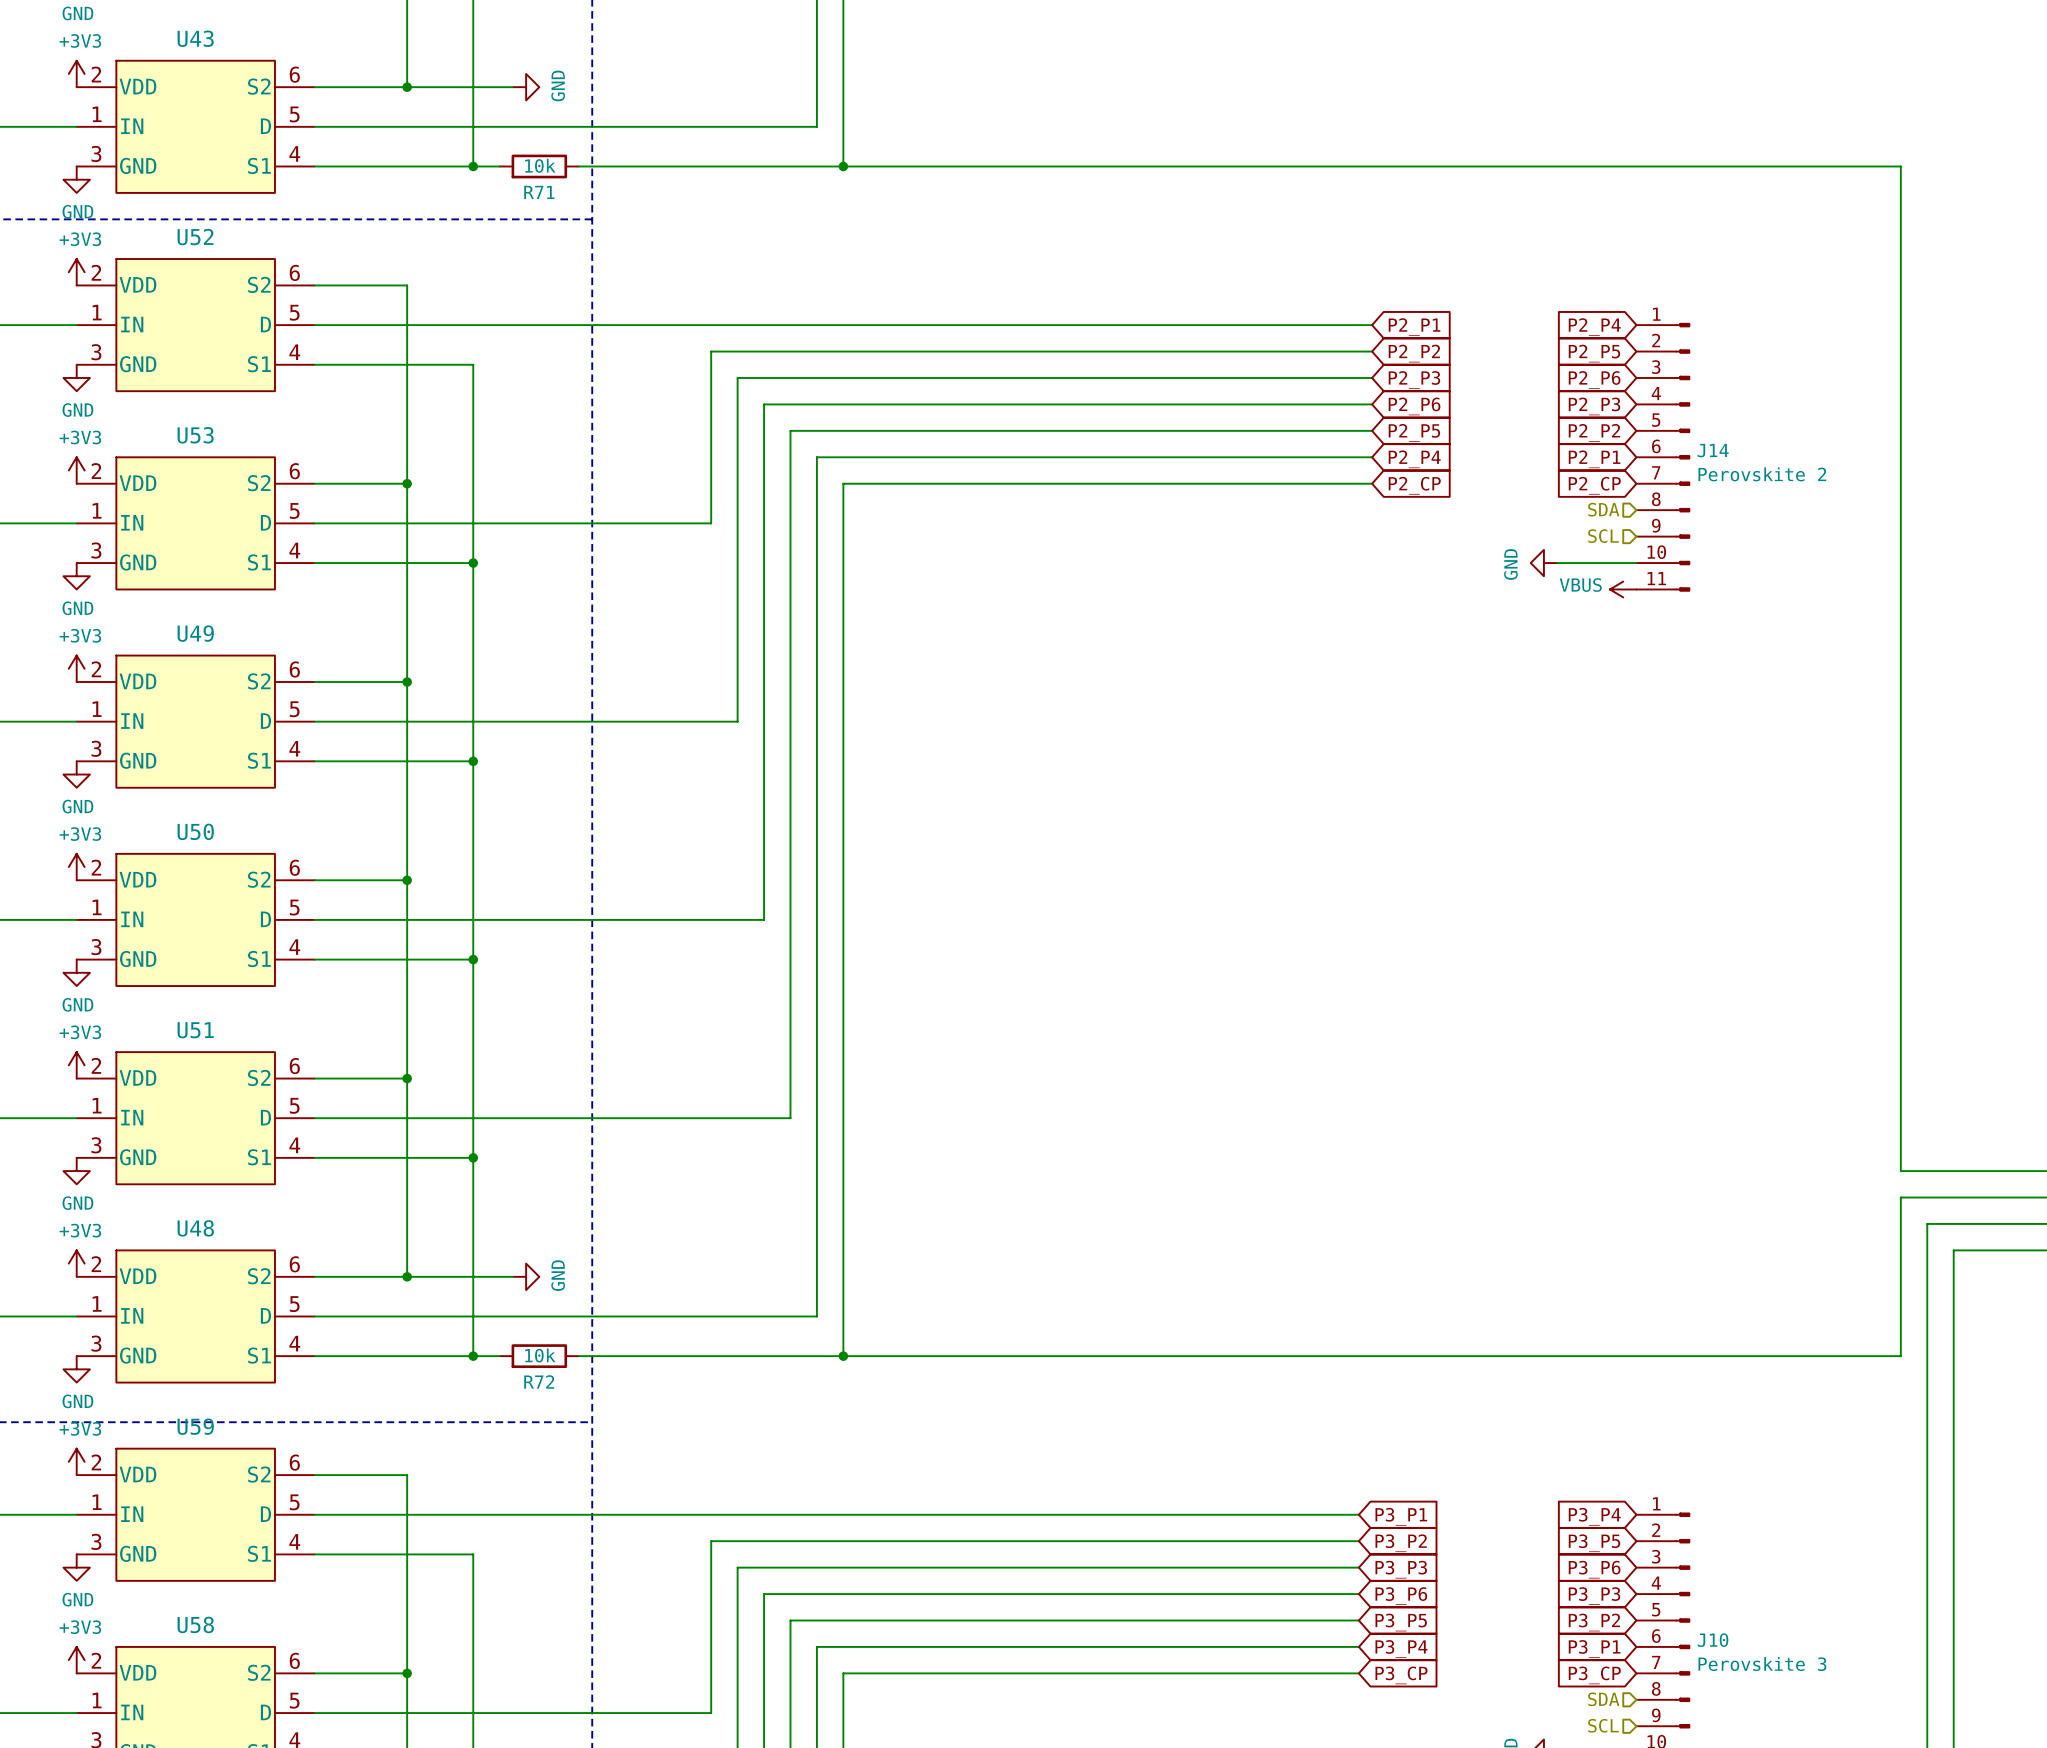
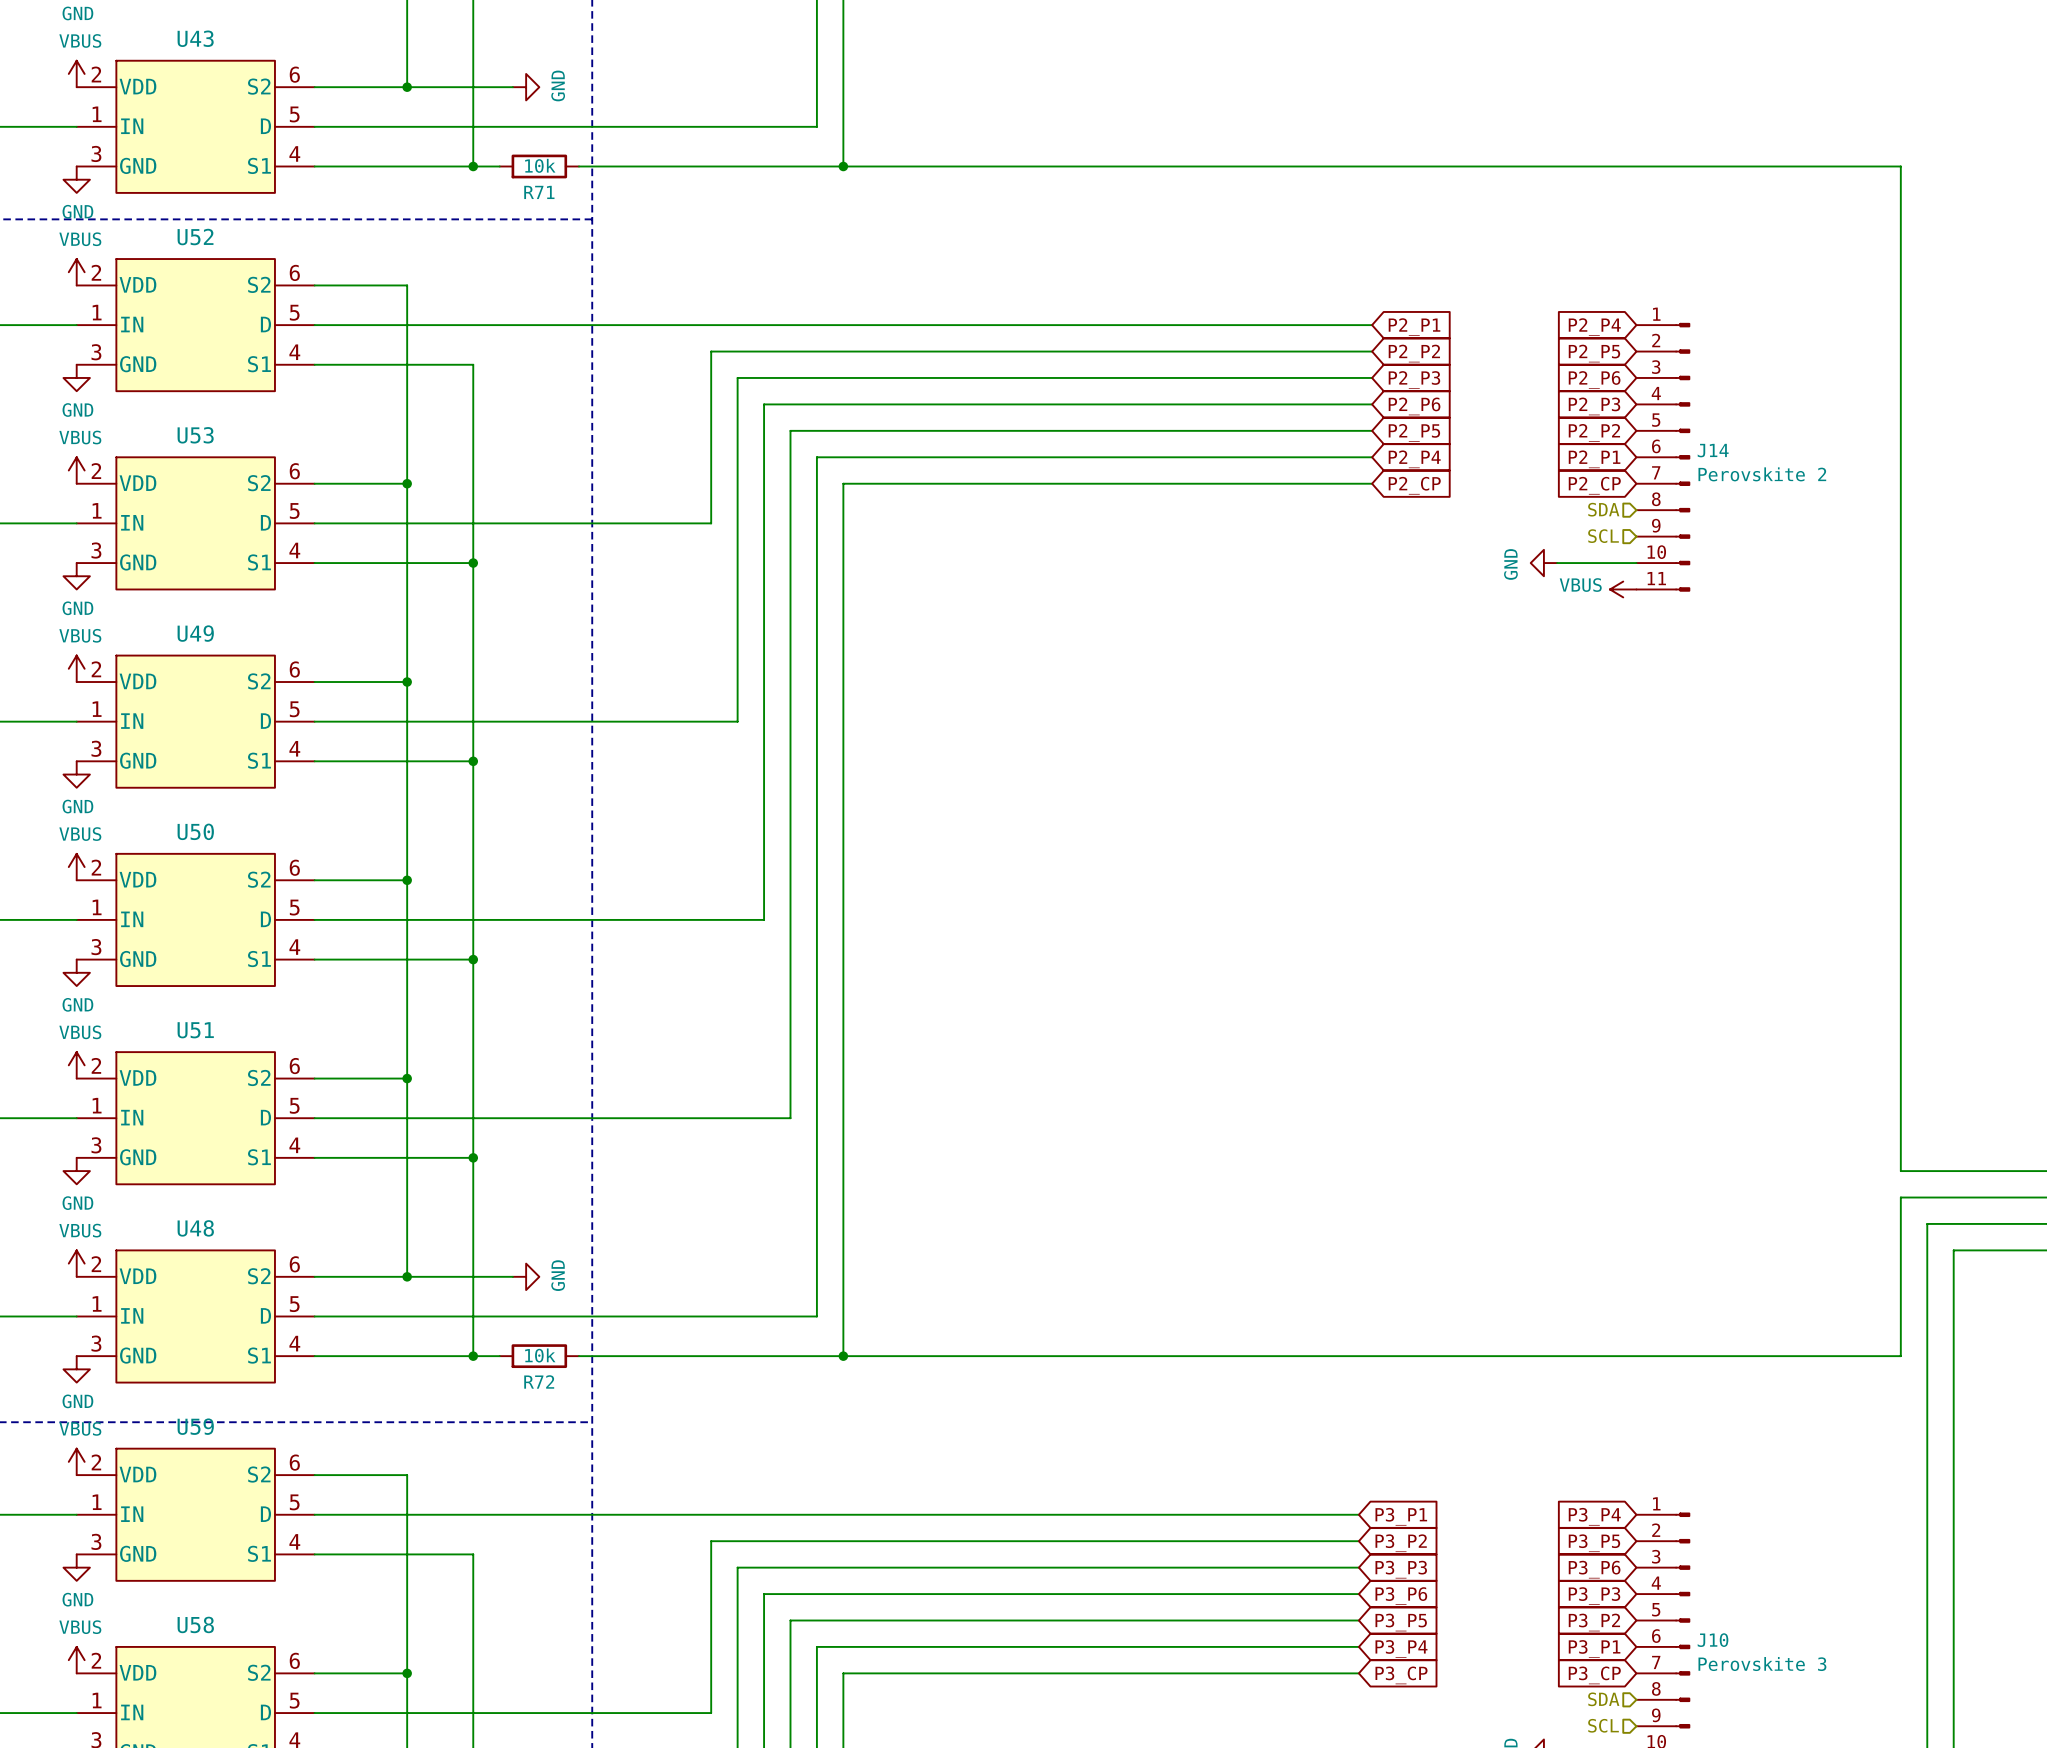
power symbol: +3V3 (76, 73) -> VBUS (76, 73)
power symbol: +3V3 (76, 272) -> VBUS (76, 272)
power symbol: +3V3 (76, 470) -> VBUS (76, 470)
power symbol: +3V3 (76, 668) -> VBUS (76, 668)
power symbol: +3V3 (76, 867) -> VBUS (76, 867)
power symbol: +3V3 (76, 1065) -> VBUS (76, 1065)
power symbol: +3V3 (76, 1263) -> VBUS (76, 1263)
power symbol: +3V3 (76, 1461) -> VBUS (76, 1461)
power symbol: +3V3 (76, 1660) -> VBUS (76, 1660)

